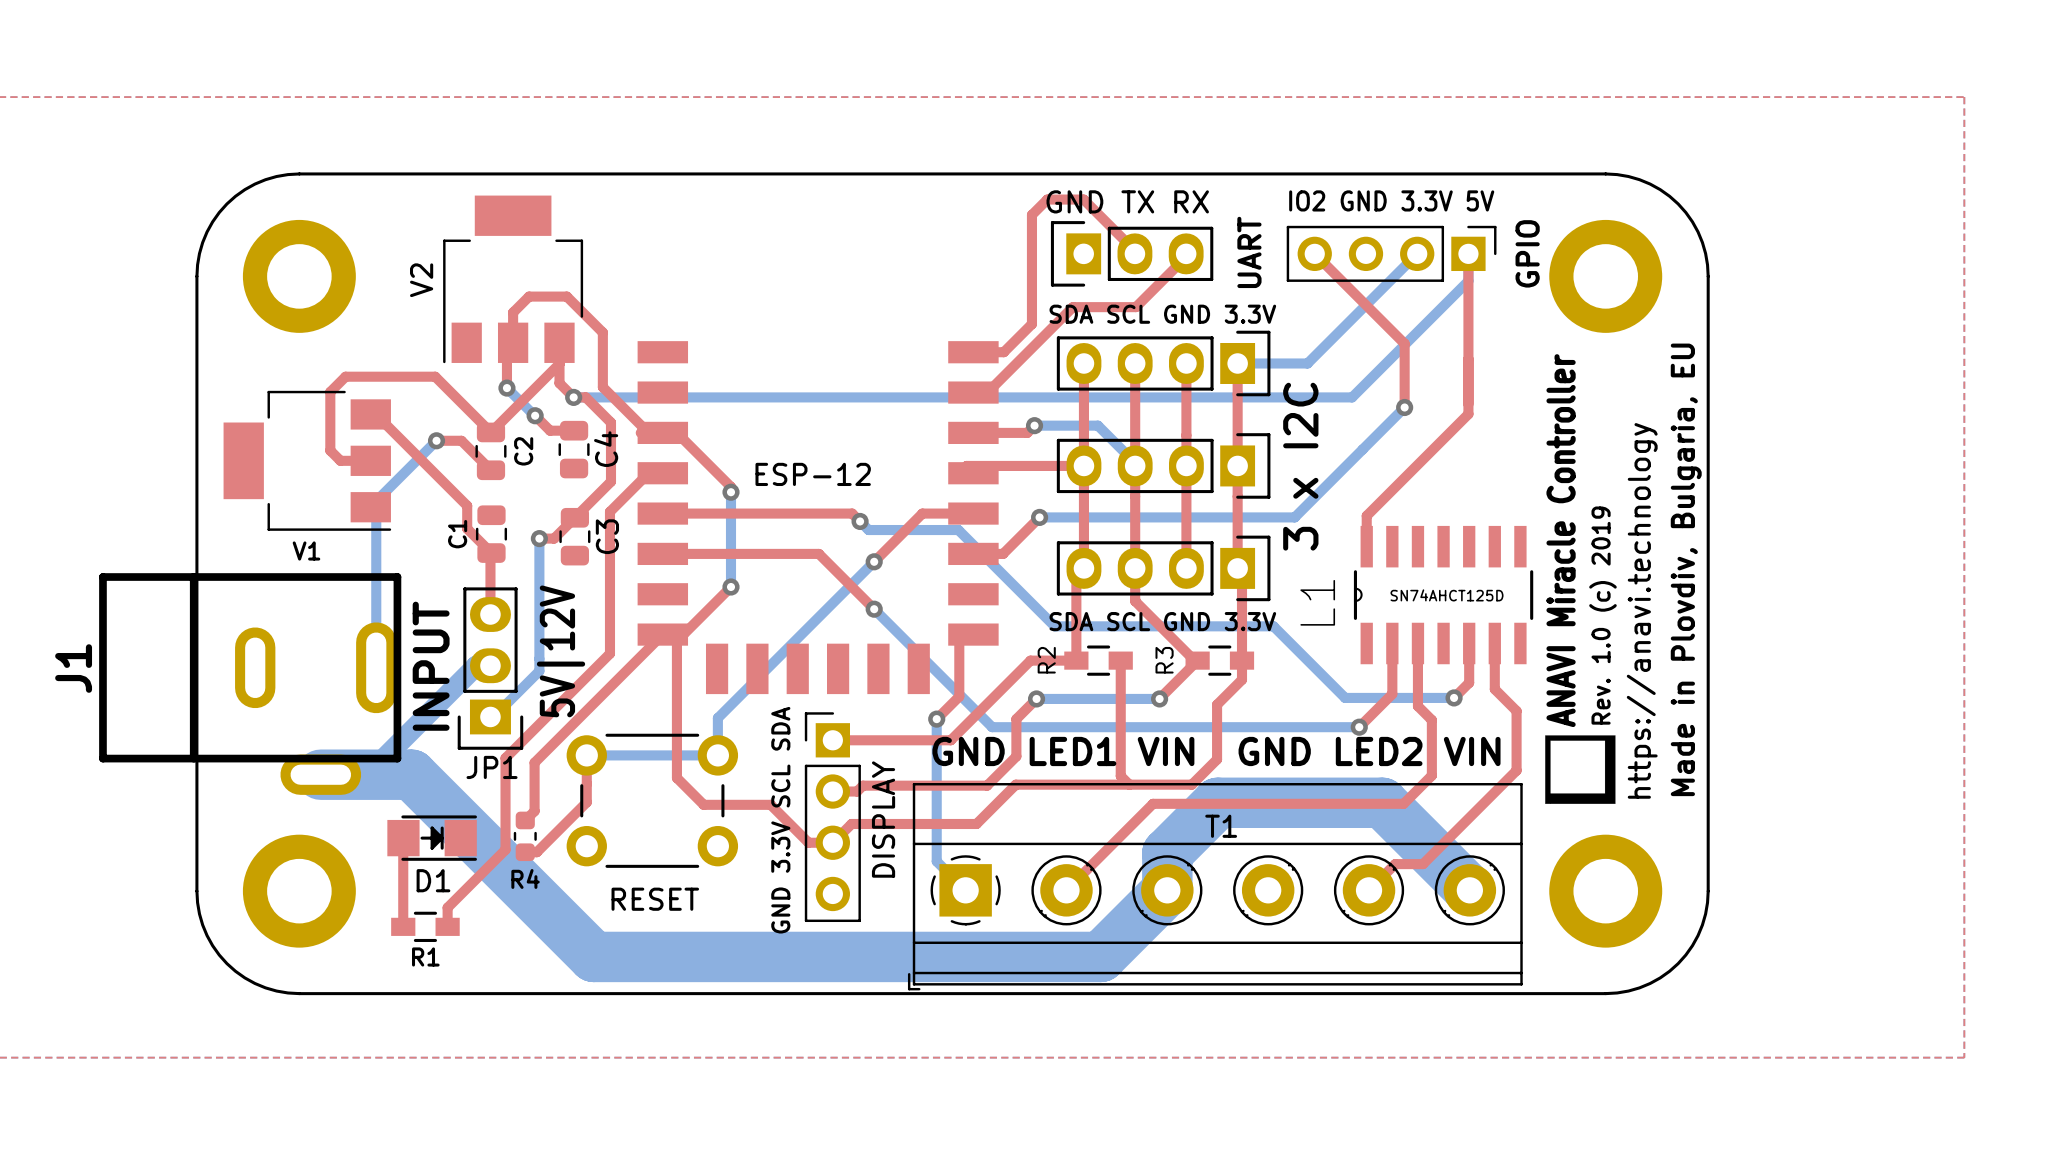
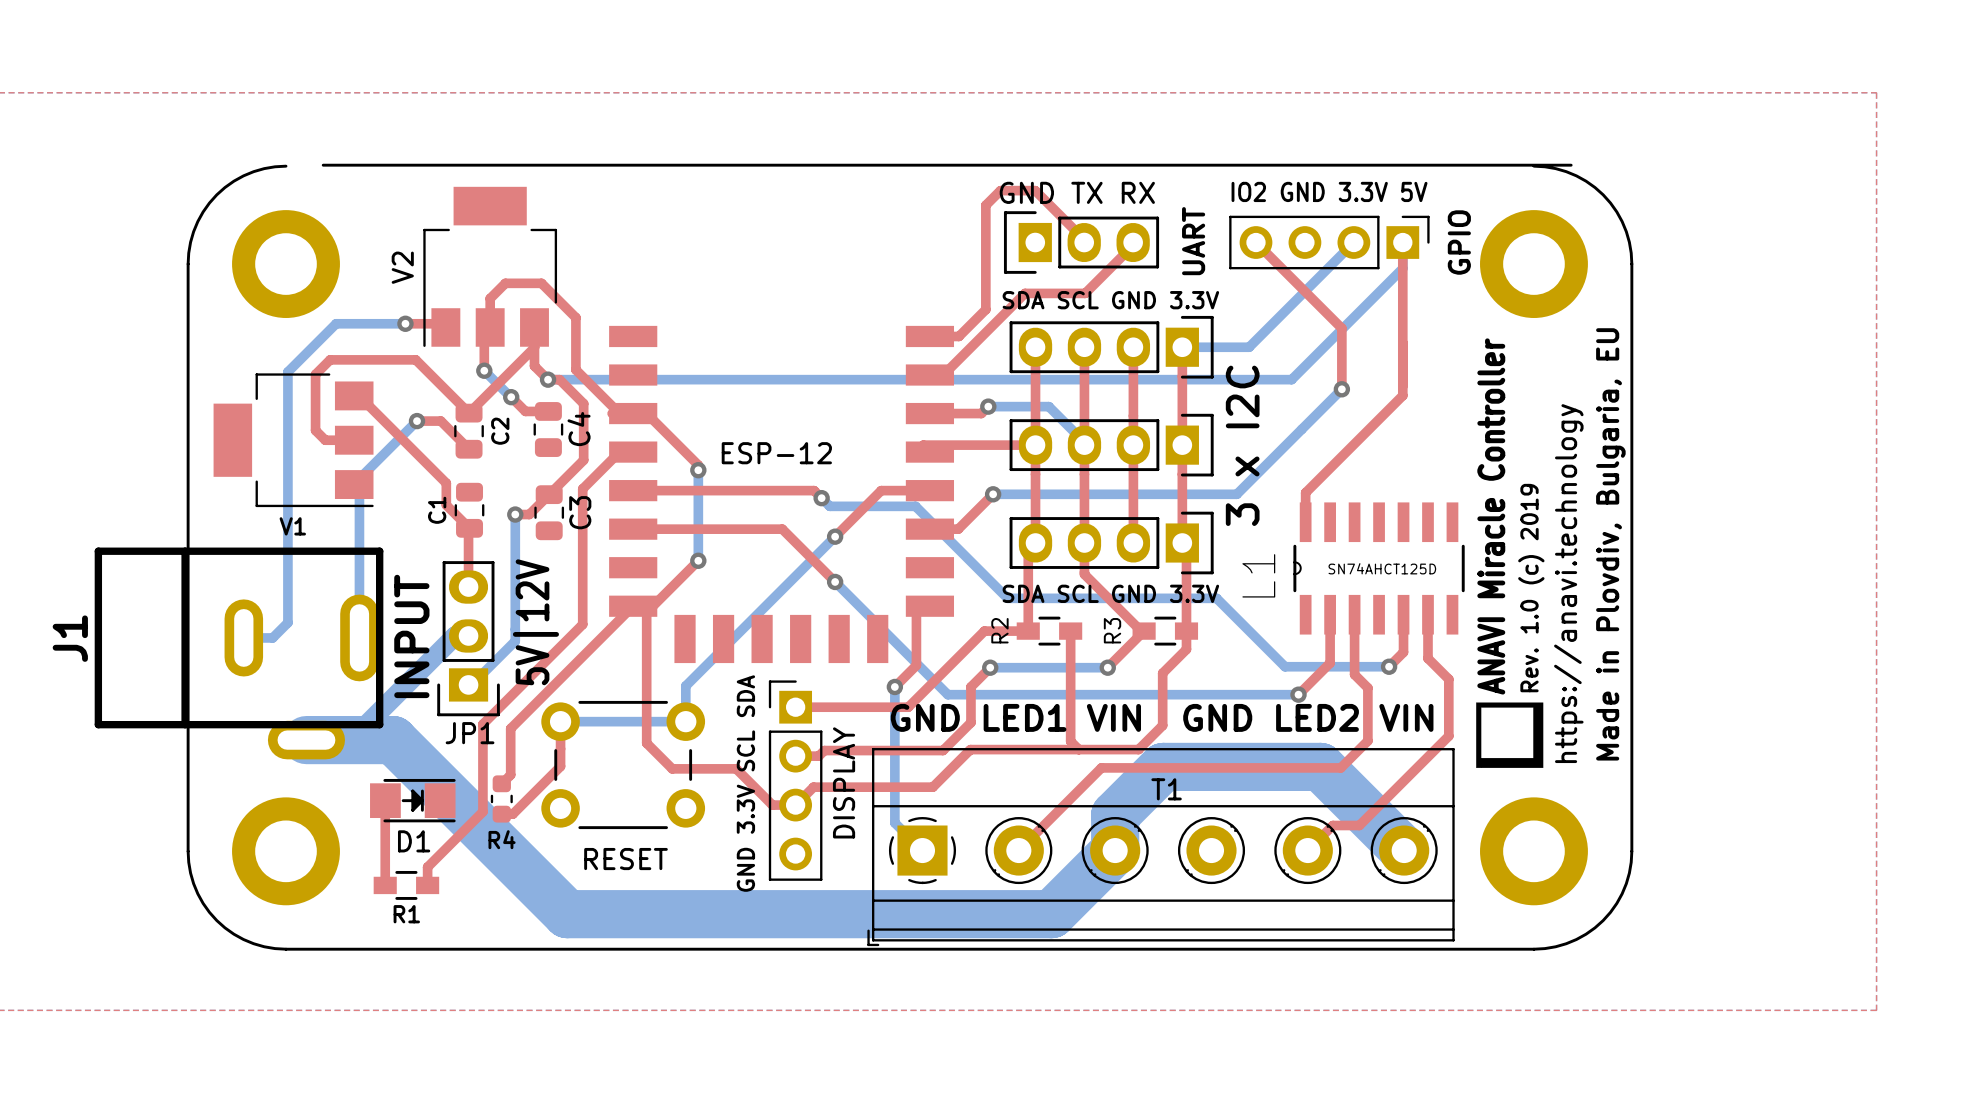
board edge: (299, 173) (1605, 173) -> (323, 165) (1571, 165)
top track: none -> (405, 323) (442, 323)
bottom track: none -> (405, 323) (336, 323) (287, 371) (287, 622) (272, 637) (243, 637)
via: none -> (405, 323)

